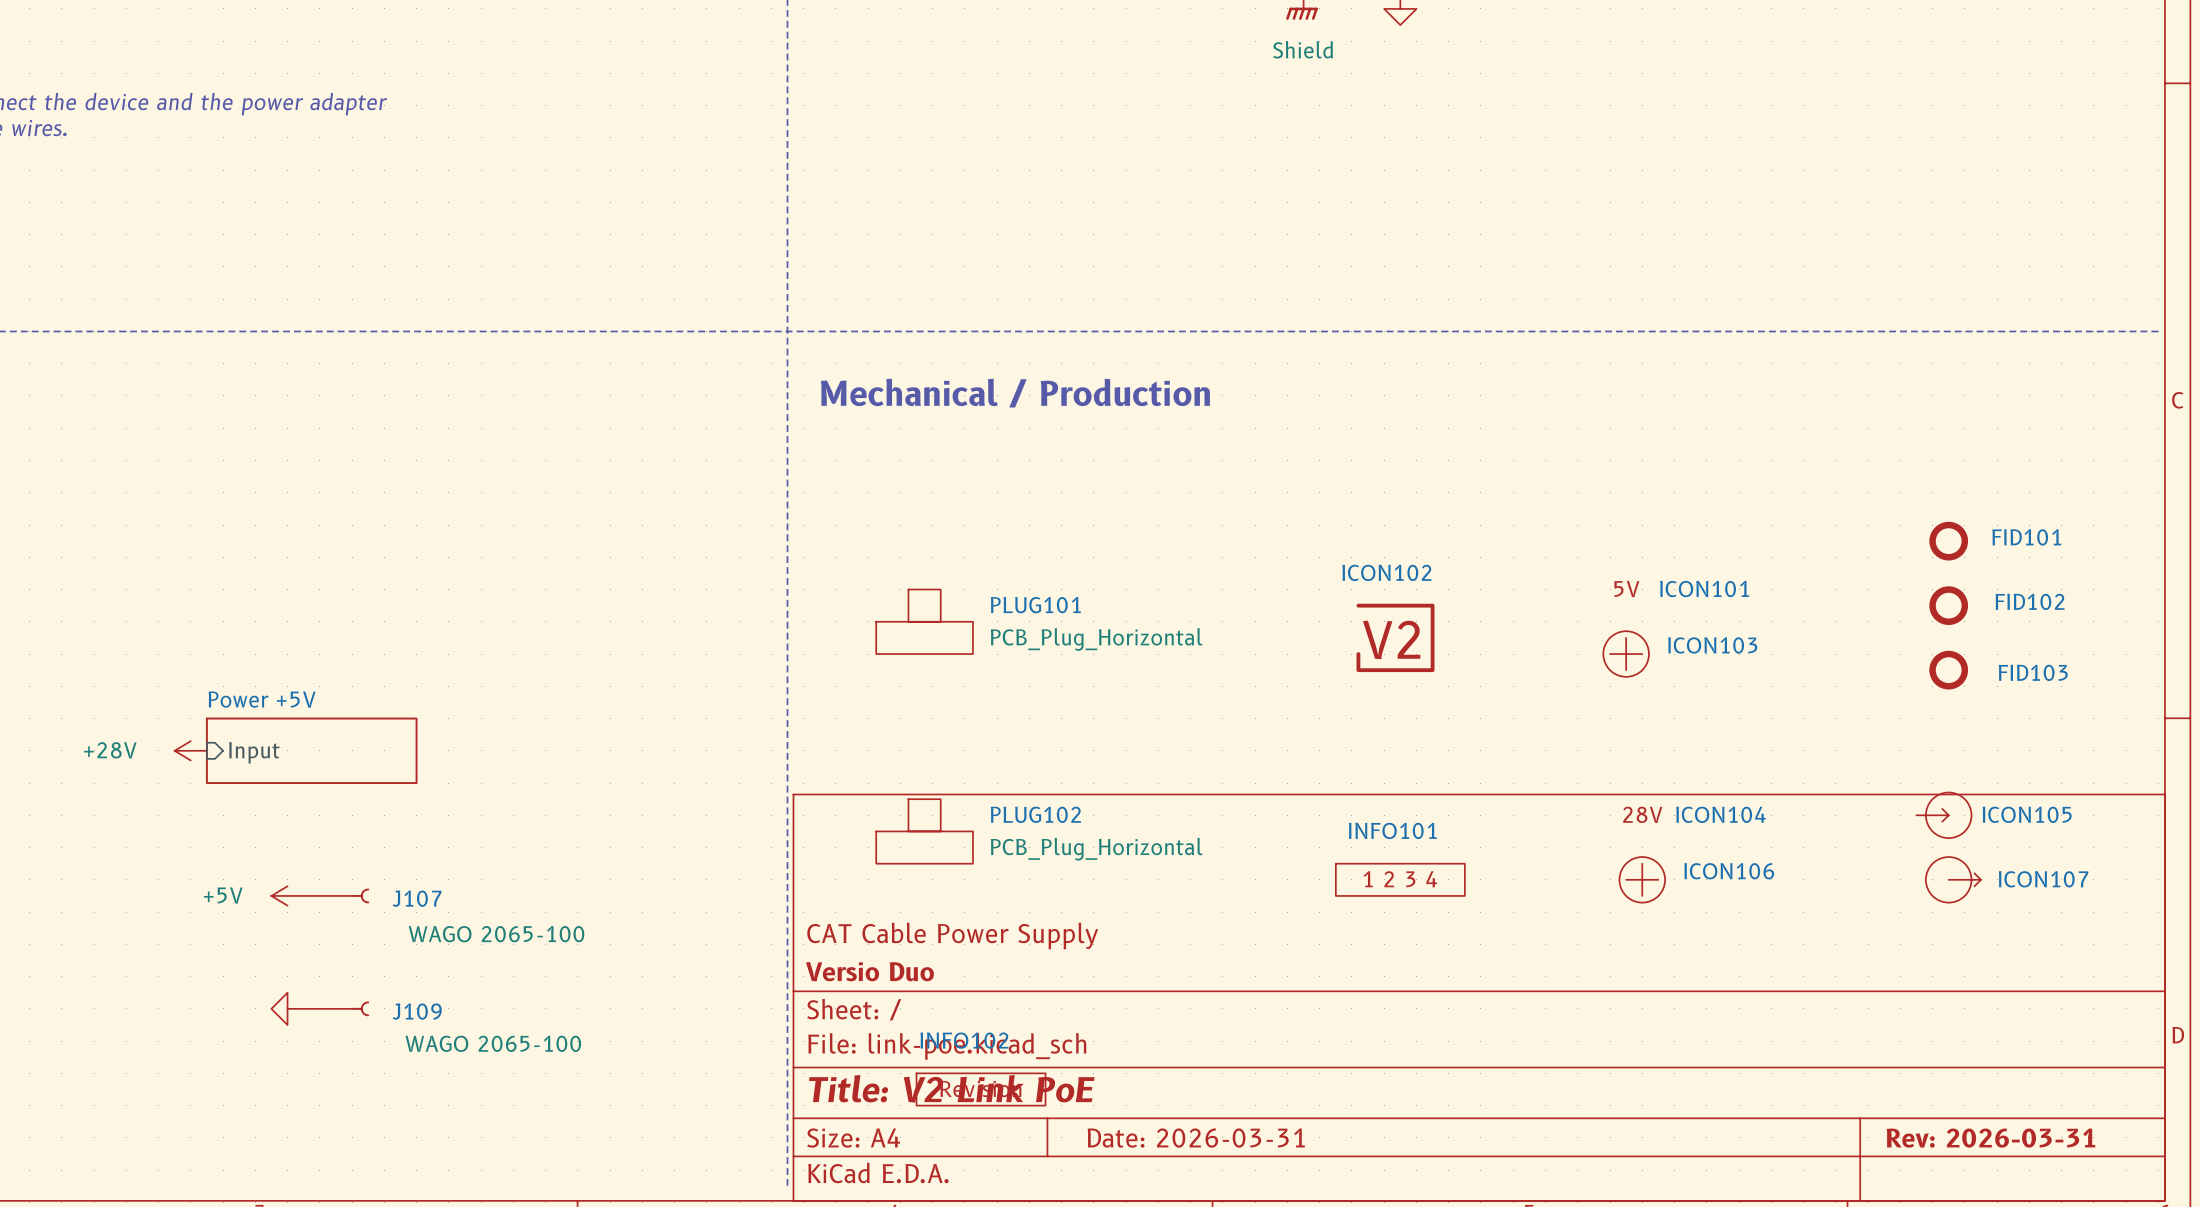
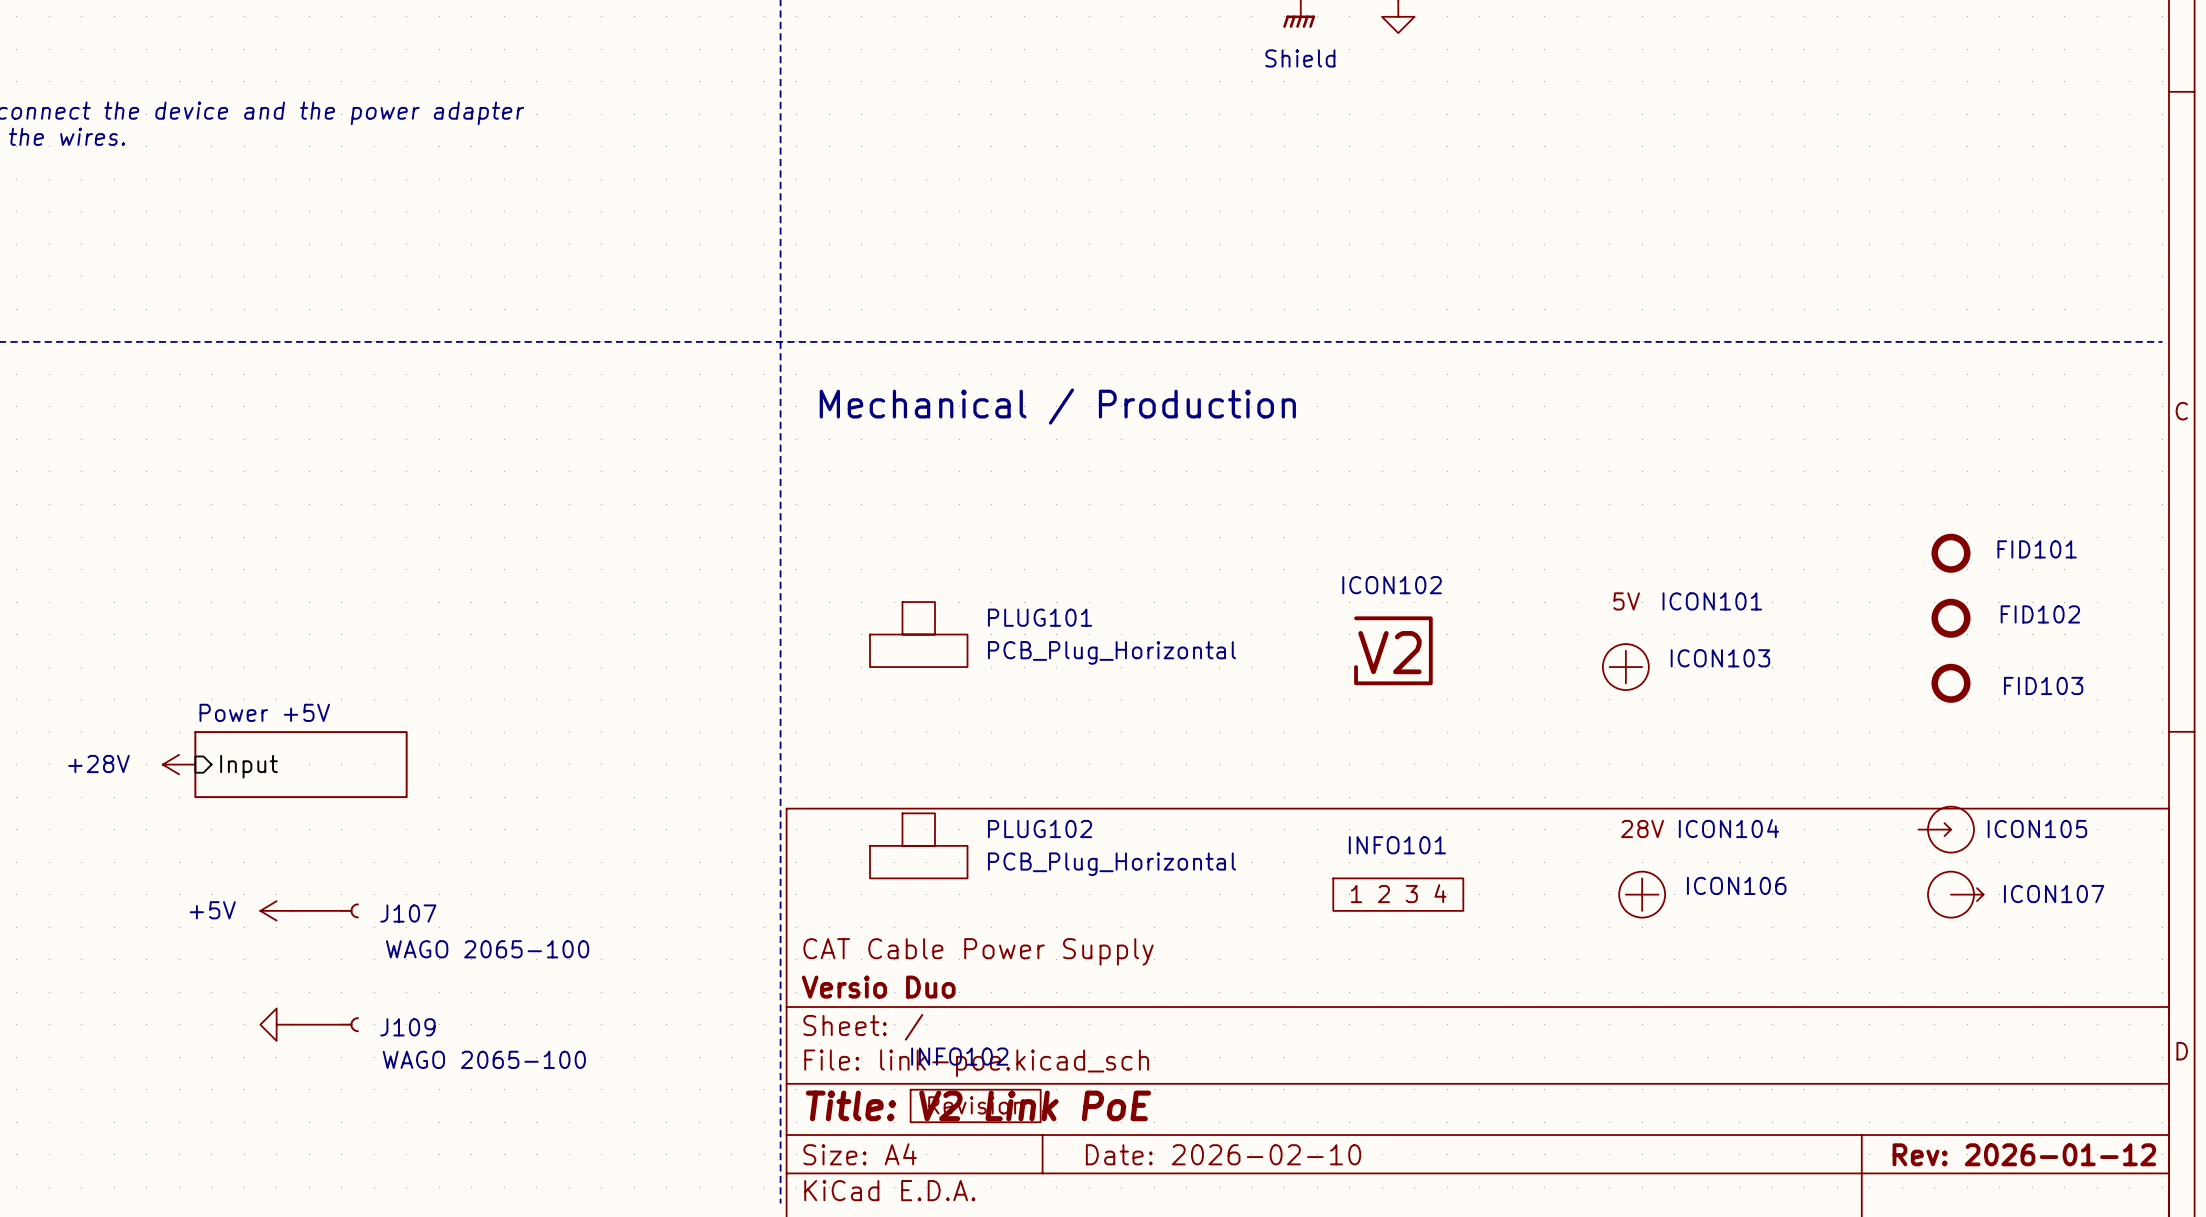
title block: Date: 2026-03-31 (1196, 1138) -> Date: 2026-02-10 (1223, 1154)
title block: Rev: 2026-03-31 (1990, 1138) -> Rev: 2026-01-12 (2024, 1154)

